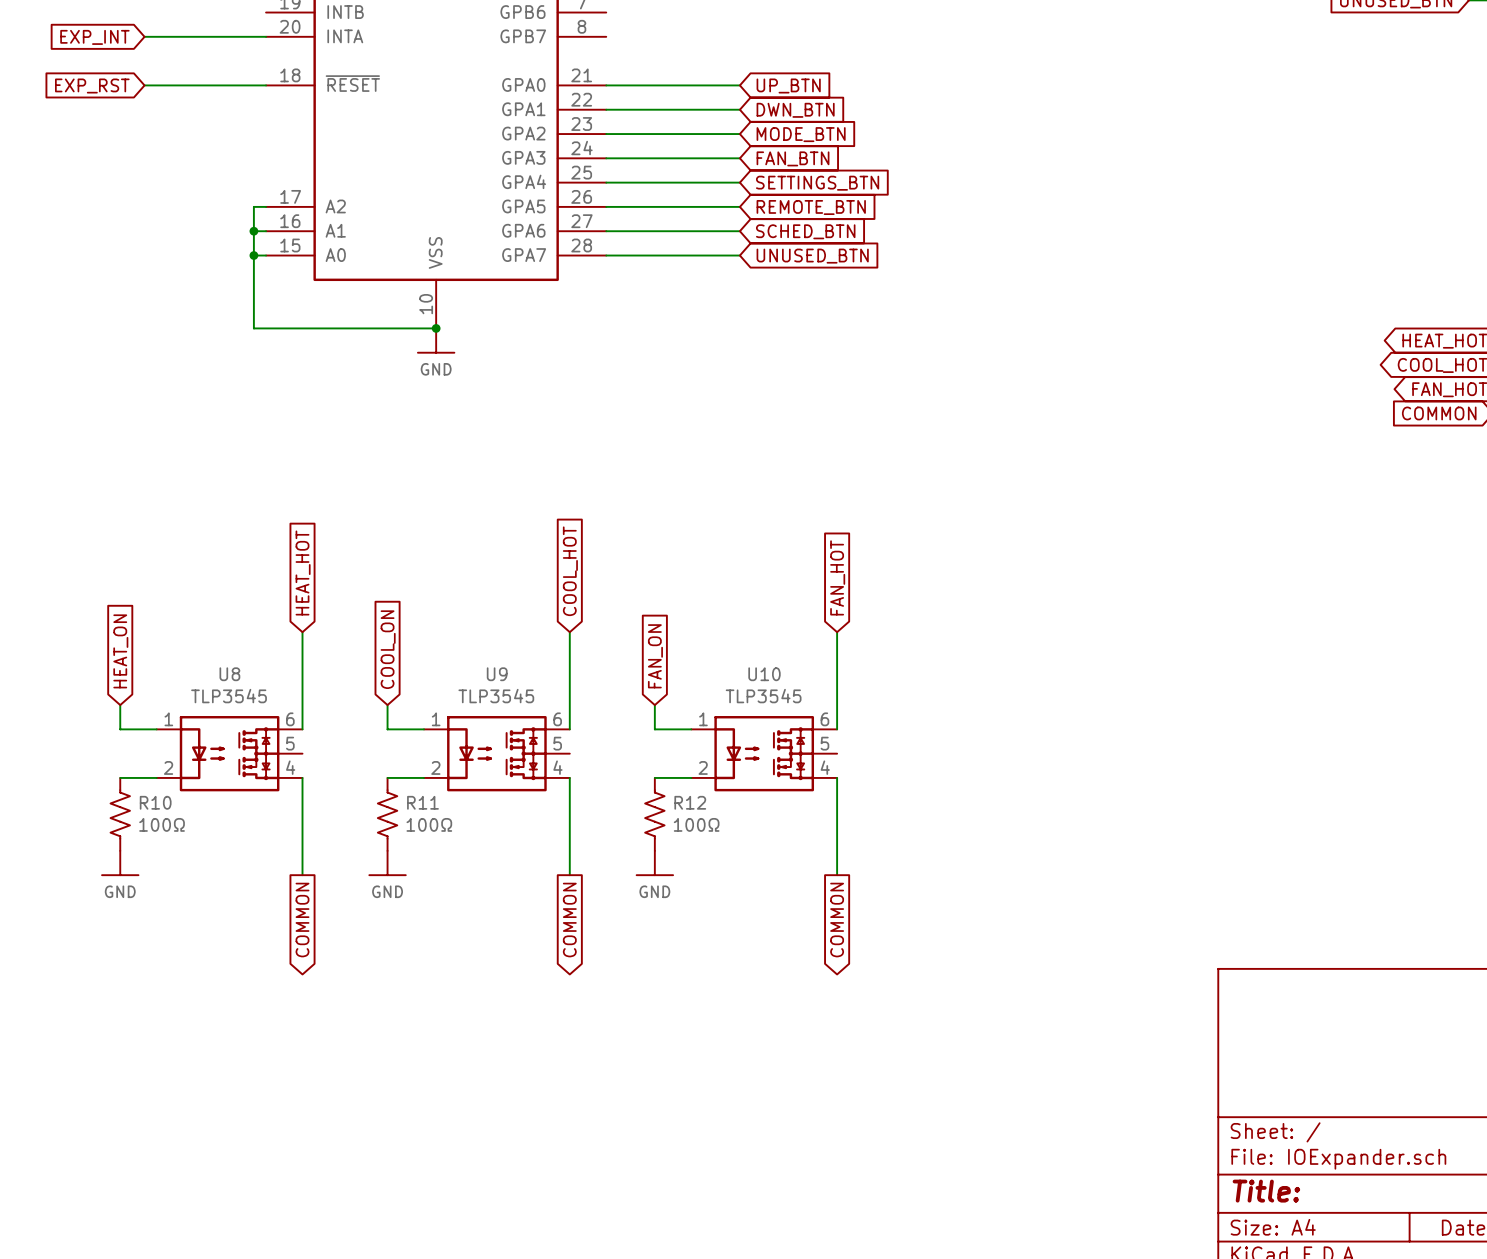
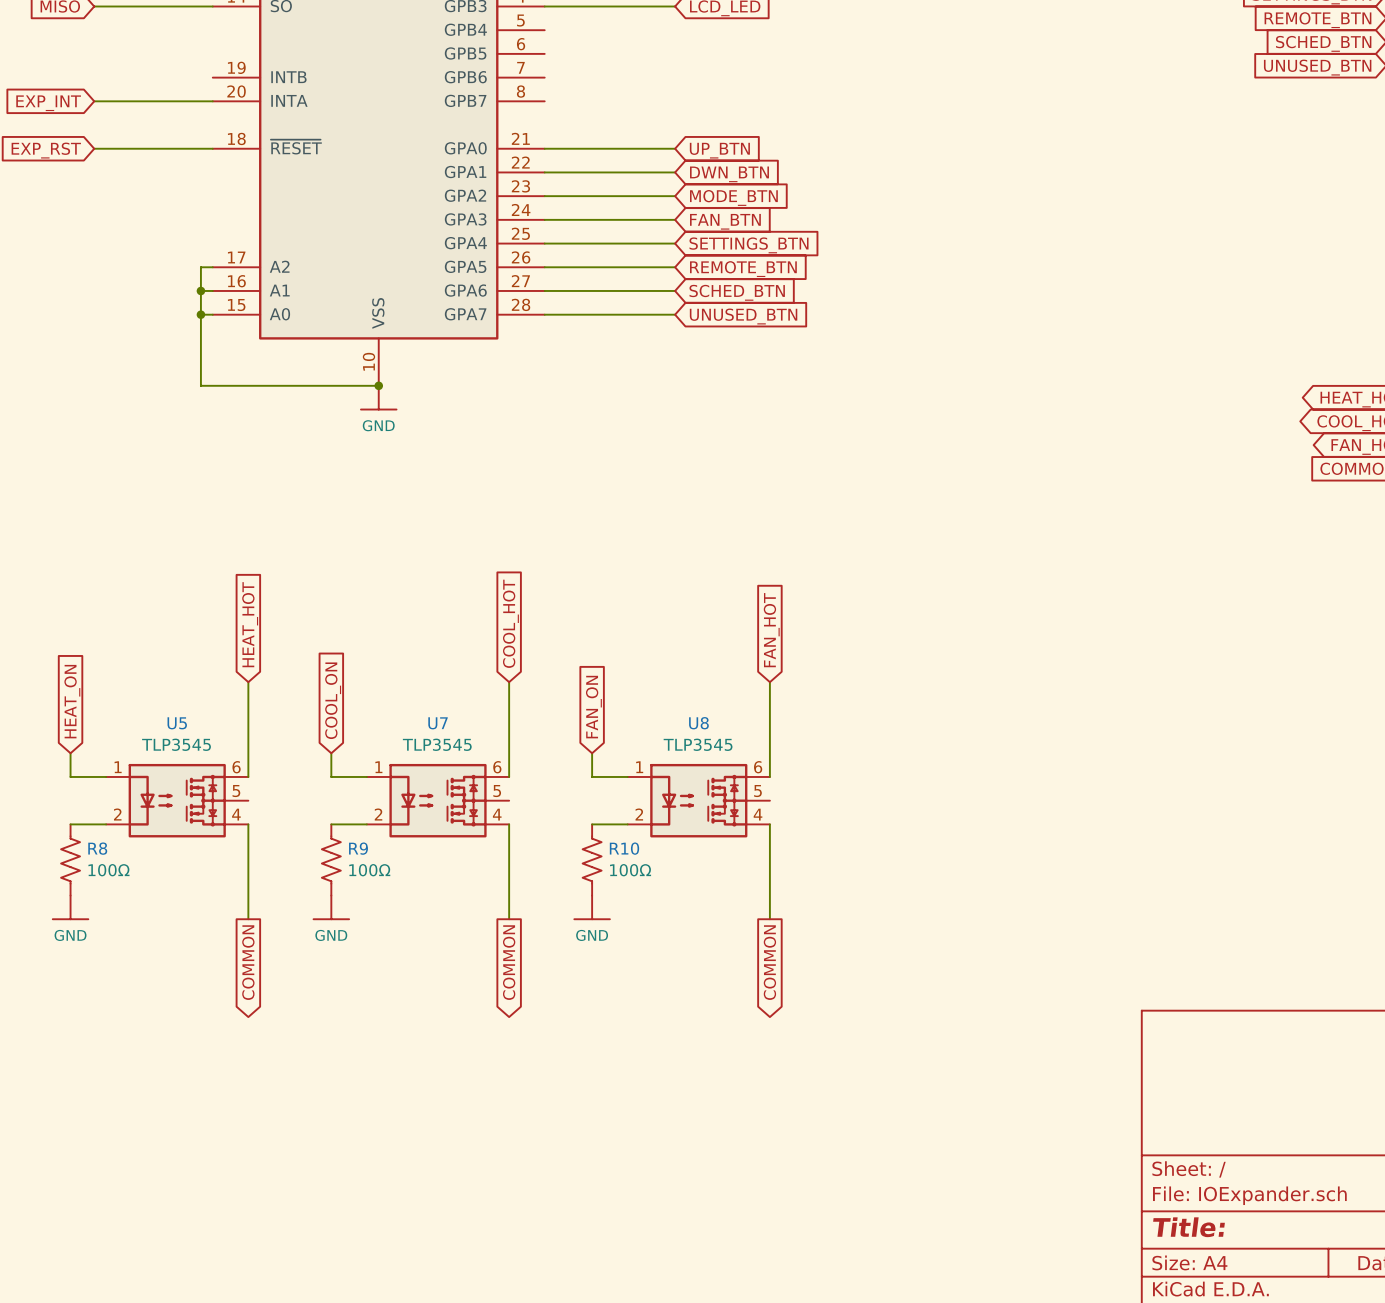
U8 name: U8 (229, 674) -> U5 (177, 723)
U9 name: U9 (497, 674) -> U7 (438, 723)
U10 name: U10 (764, 674) -> U8 (698, 723)
R10 name: R10 (155, 802) -> R8 (97, 848)
R11 name: R11 (422, 802) -> R9 (358, 848)
R12 name: R12 (690, 802) -> R10 (624, 848)

